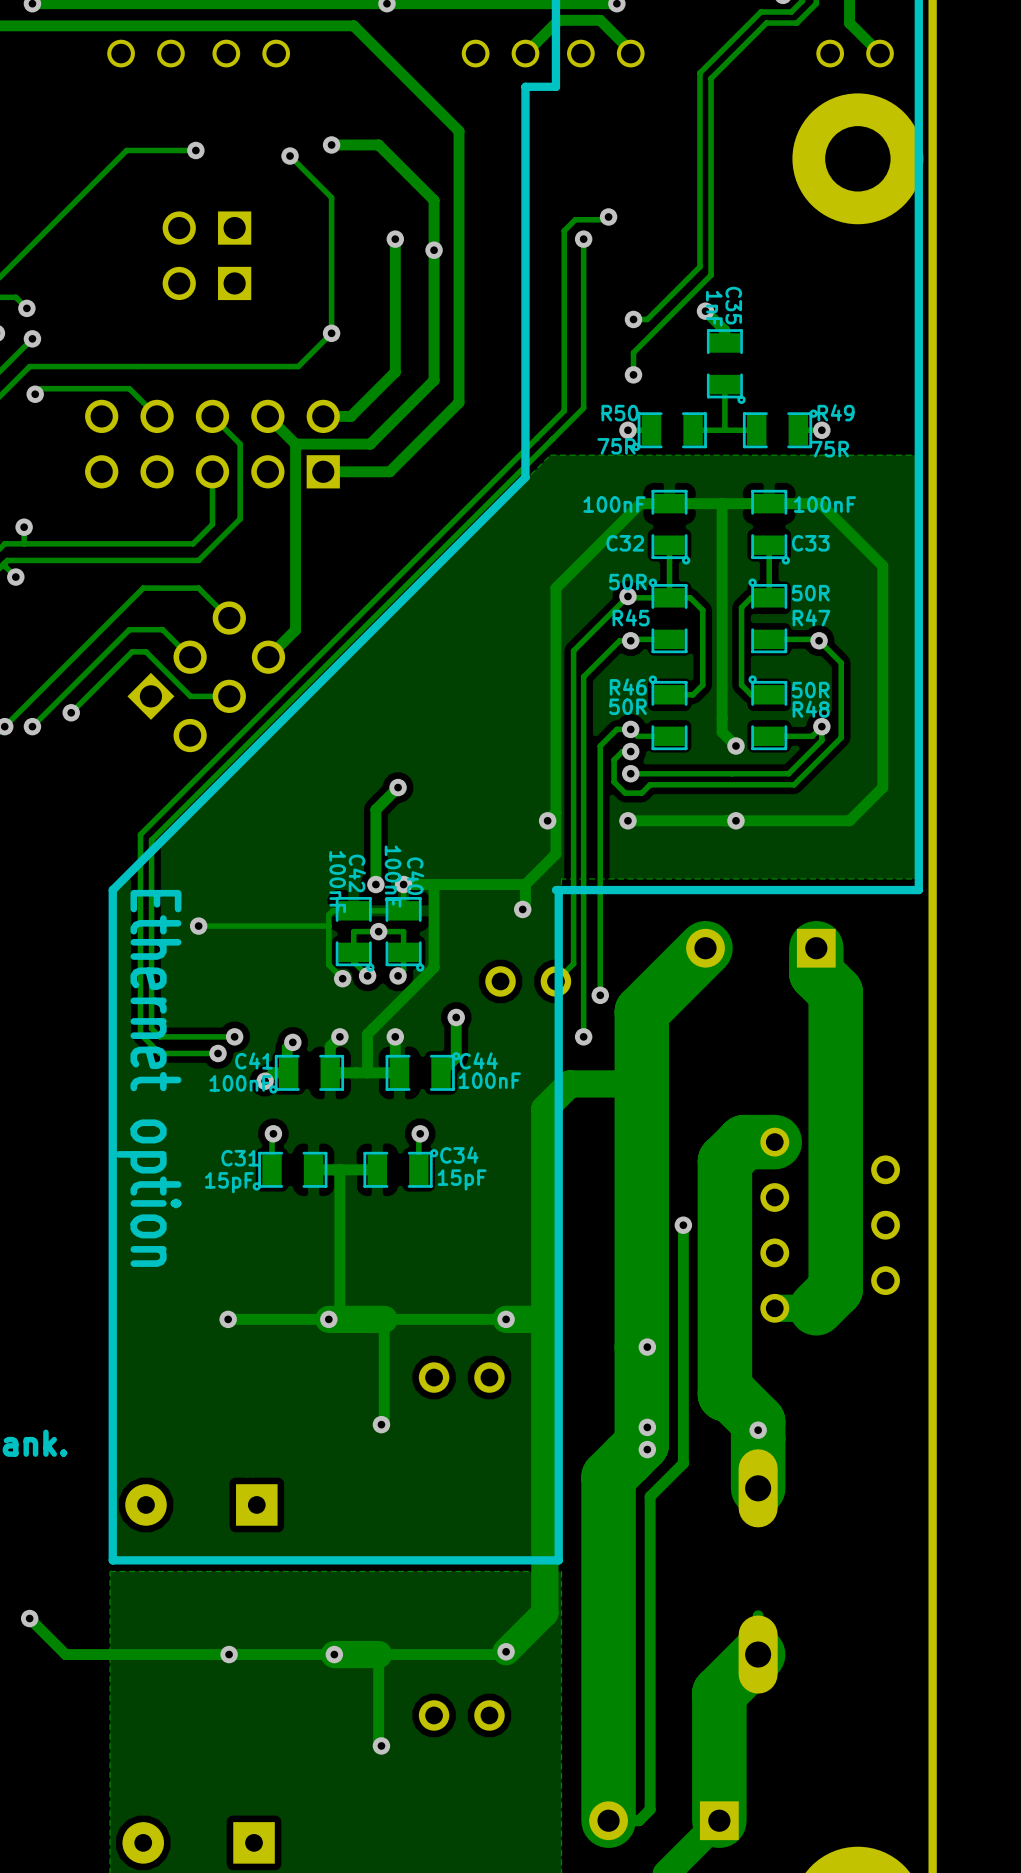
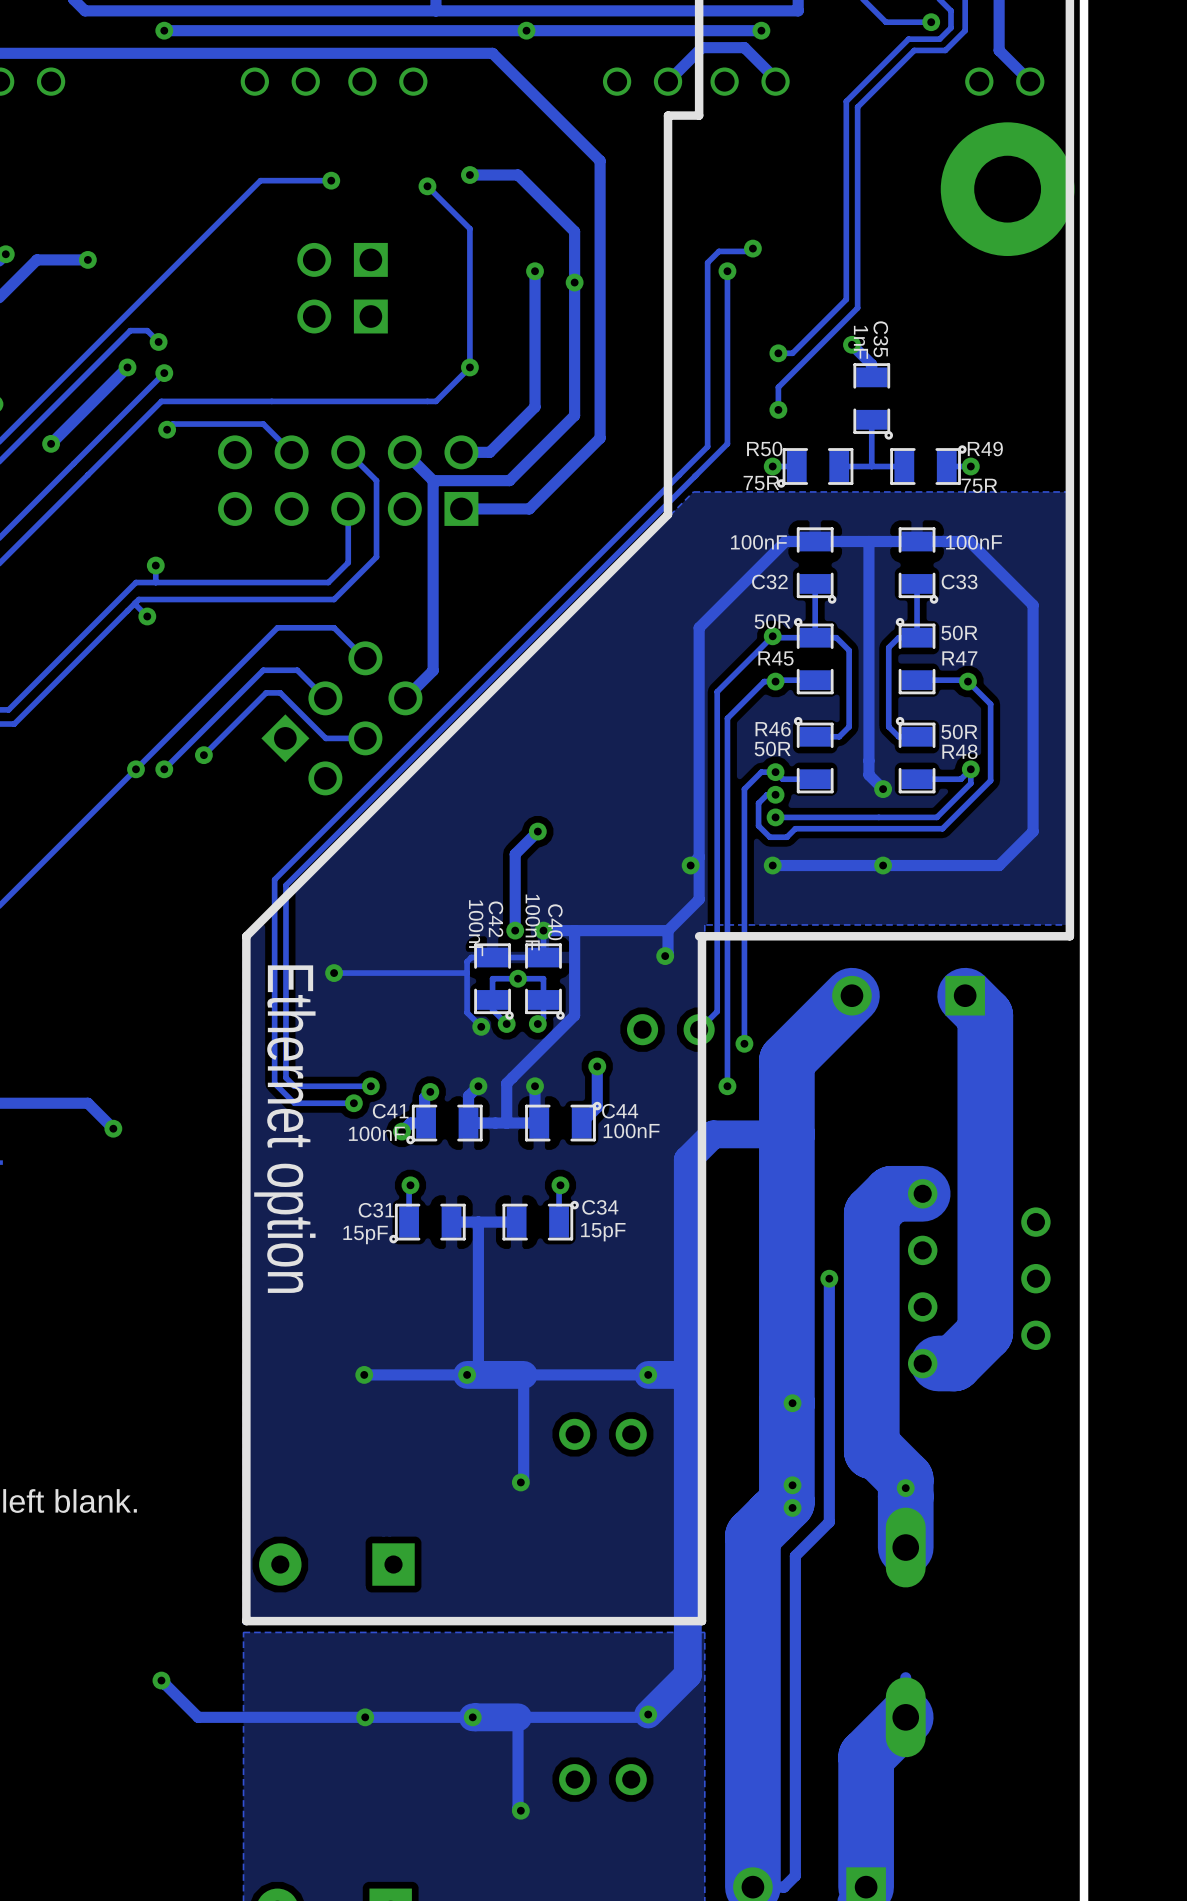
track: (816, 948) (816, 973) (835, 992) (835, 1288) (816, 1308) (774, 1308) -> (965, 995) (985, 1015) (985, 1332) (954, 1363) (922, 1363)

